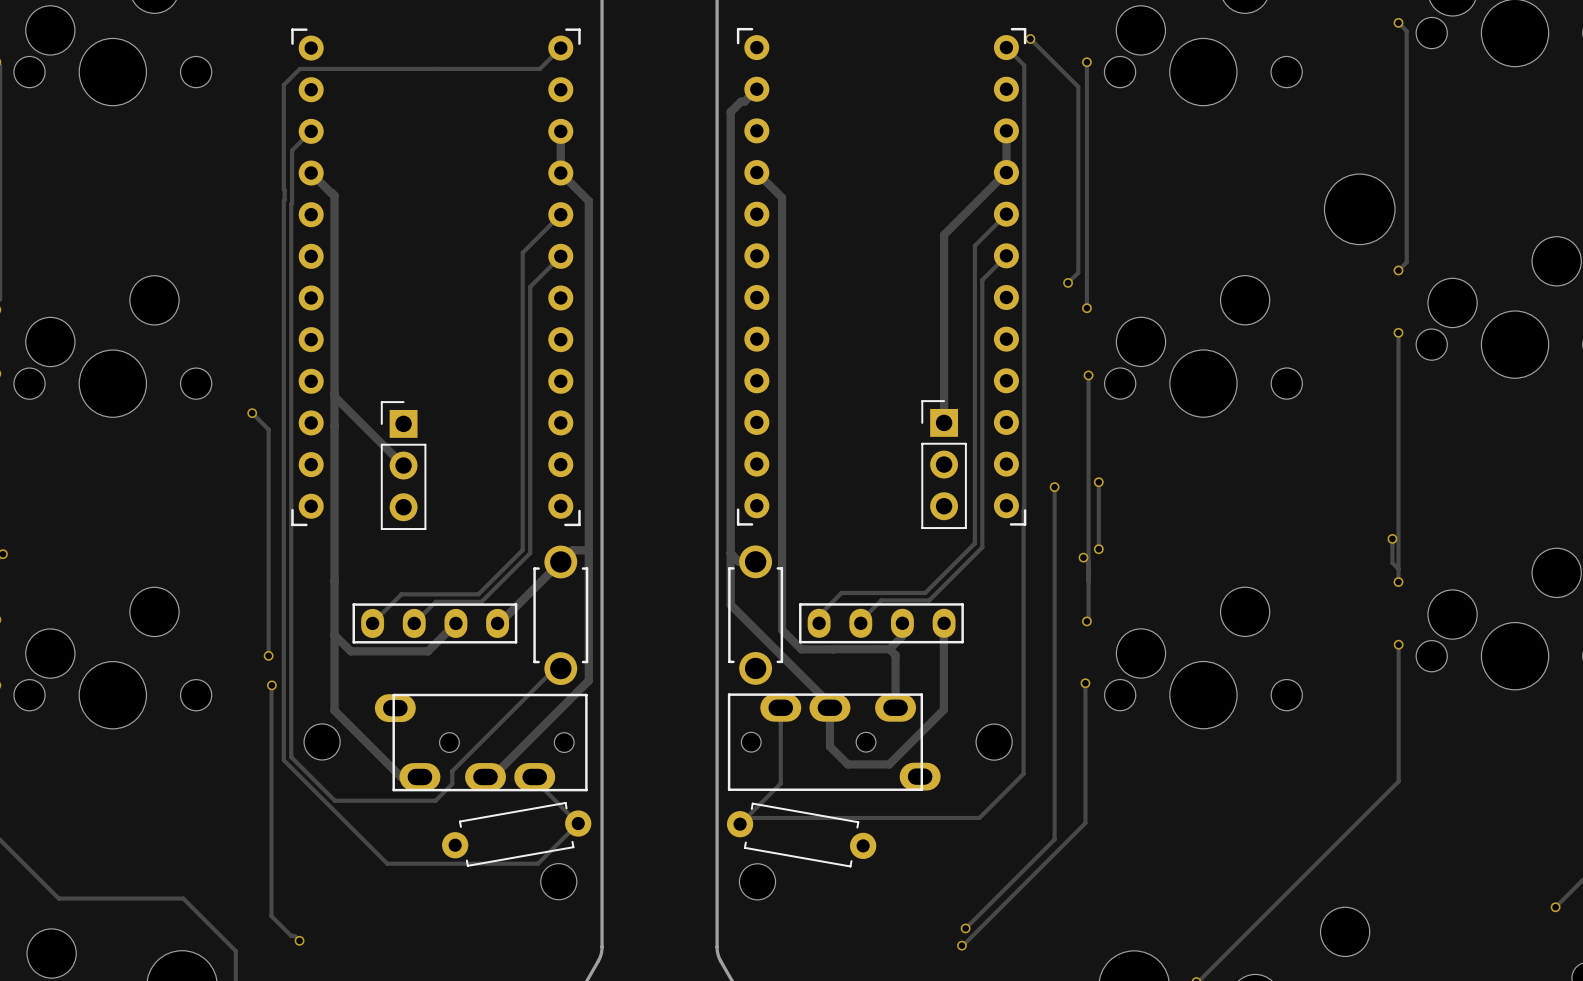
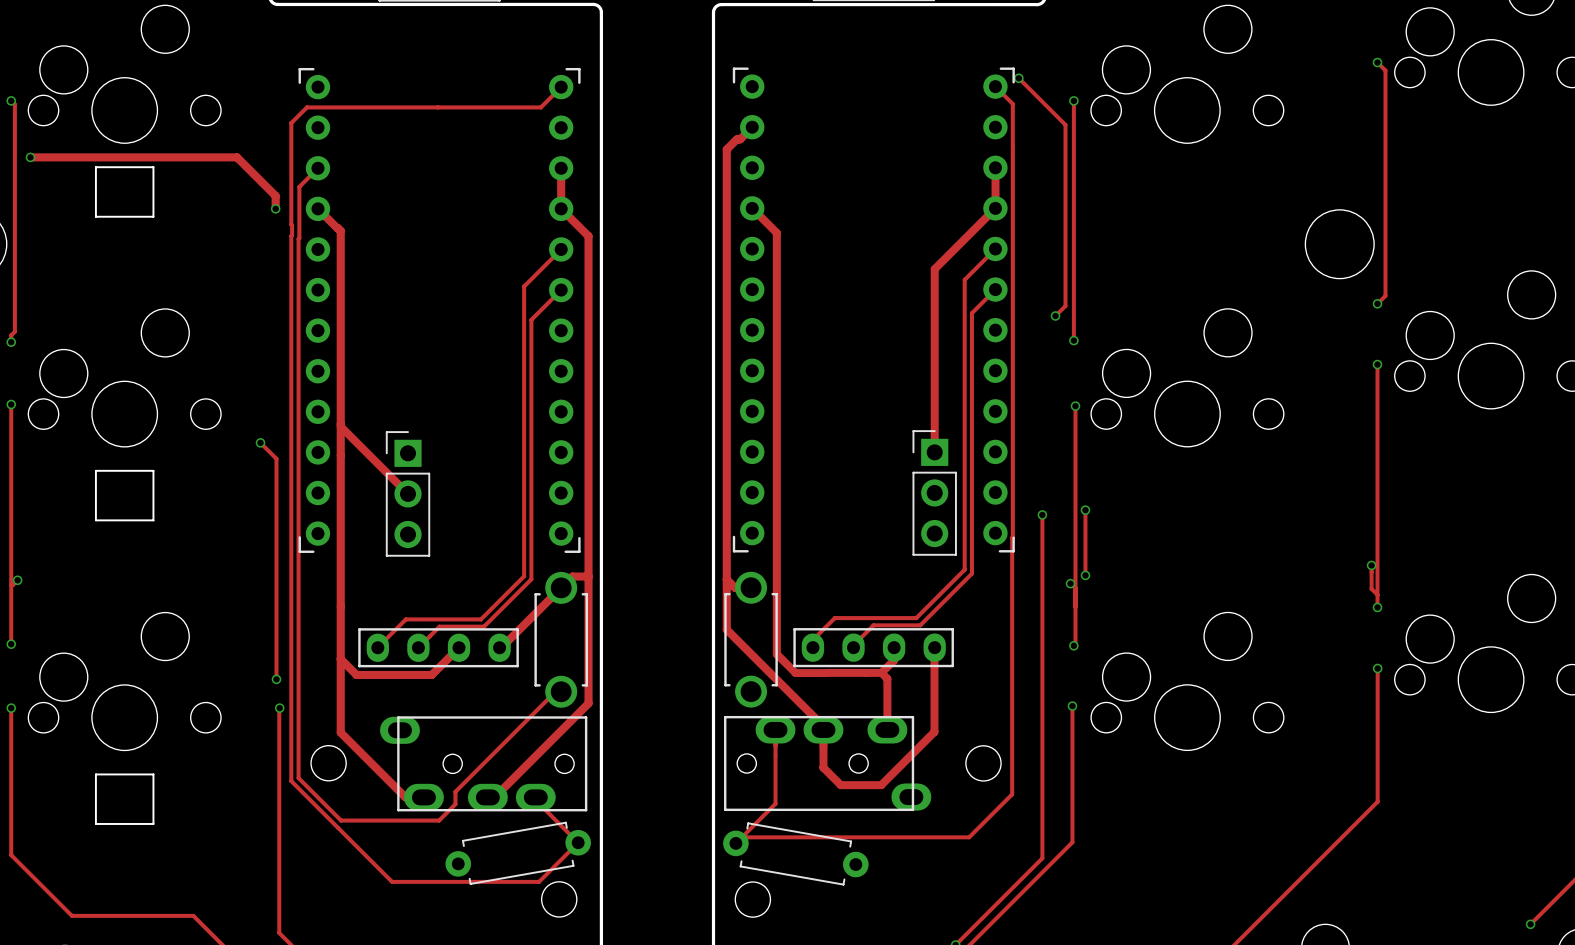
track: none -> (30, 157) (237, 157) (275, 196) (275, 208)
via: none -> (30, 157)
part: none -> (124, 191)
via: none -> (275, 208)
part: none -> (124, 495)
part: none -> (124, 799)

